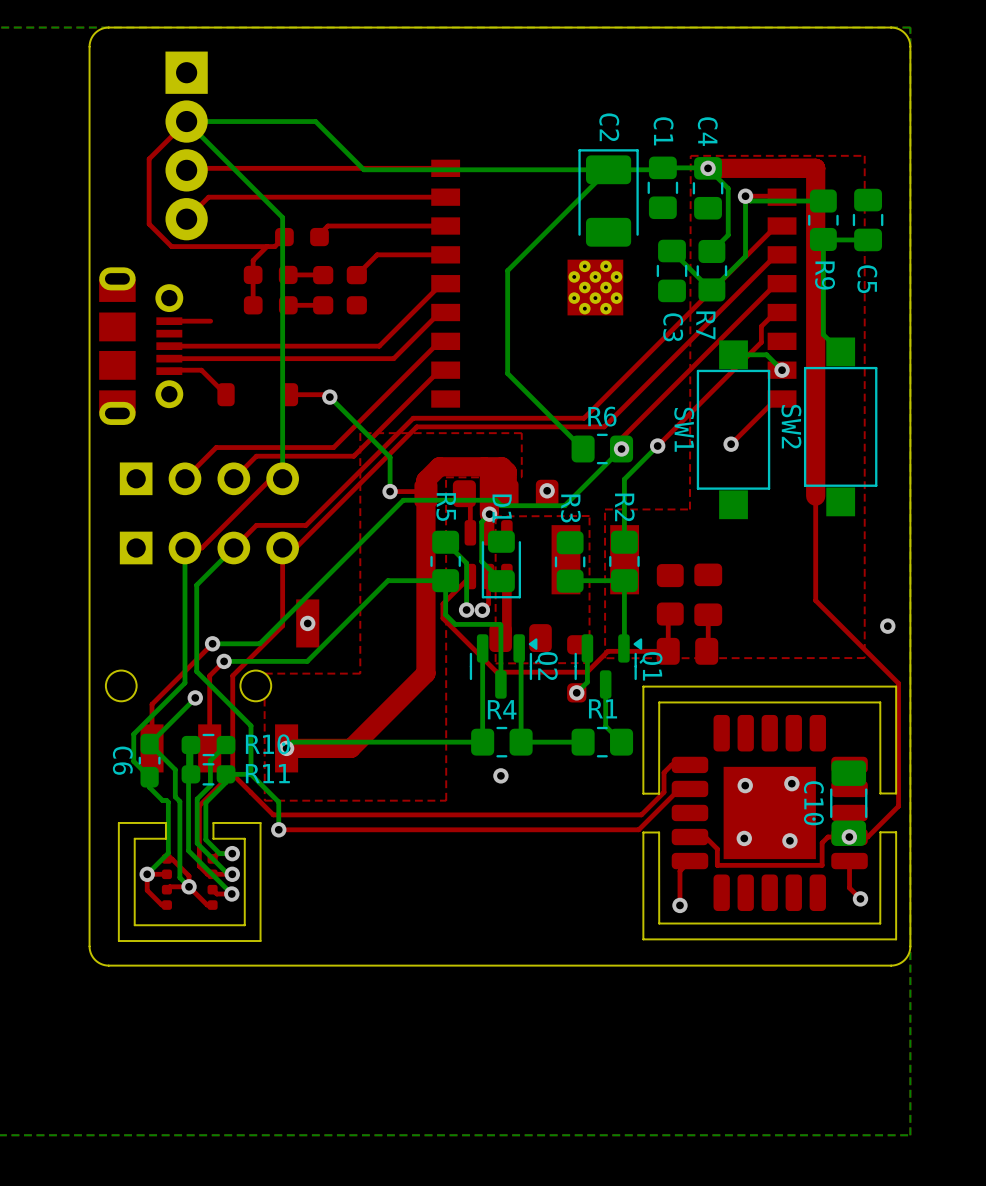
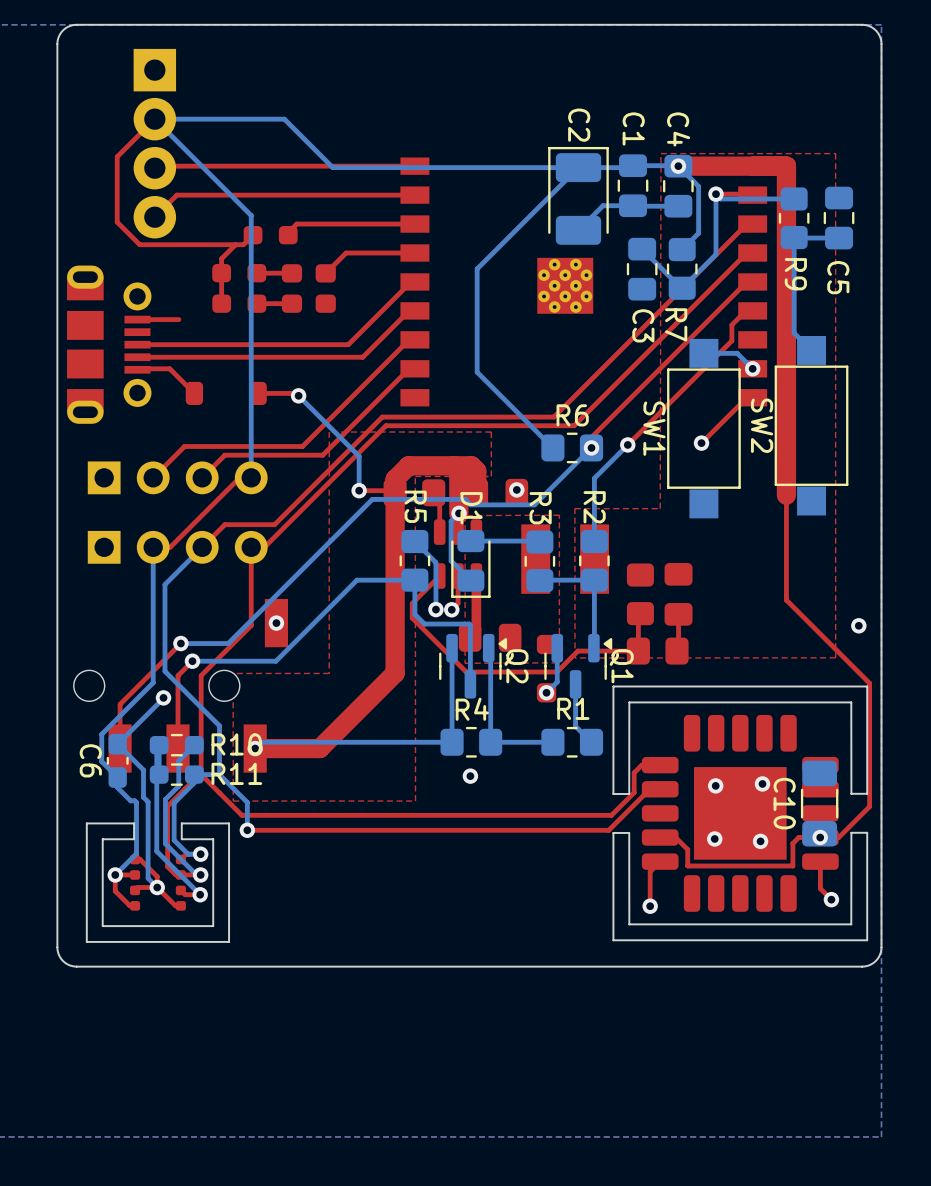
bottom track: none -> (678, 206) (603, 205) (578, 230)
bottom track: none -> (470, 541) (539, 542)

